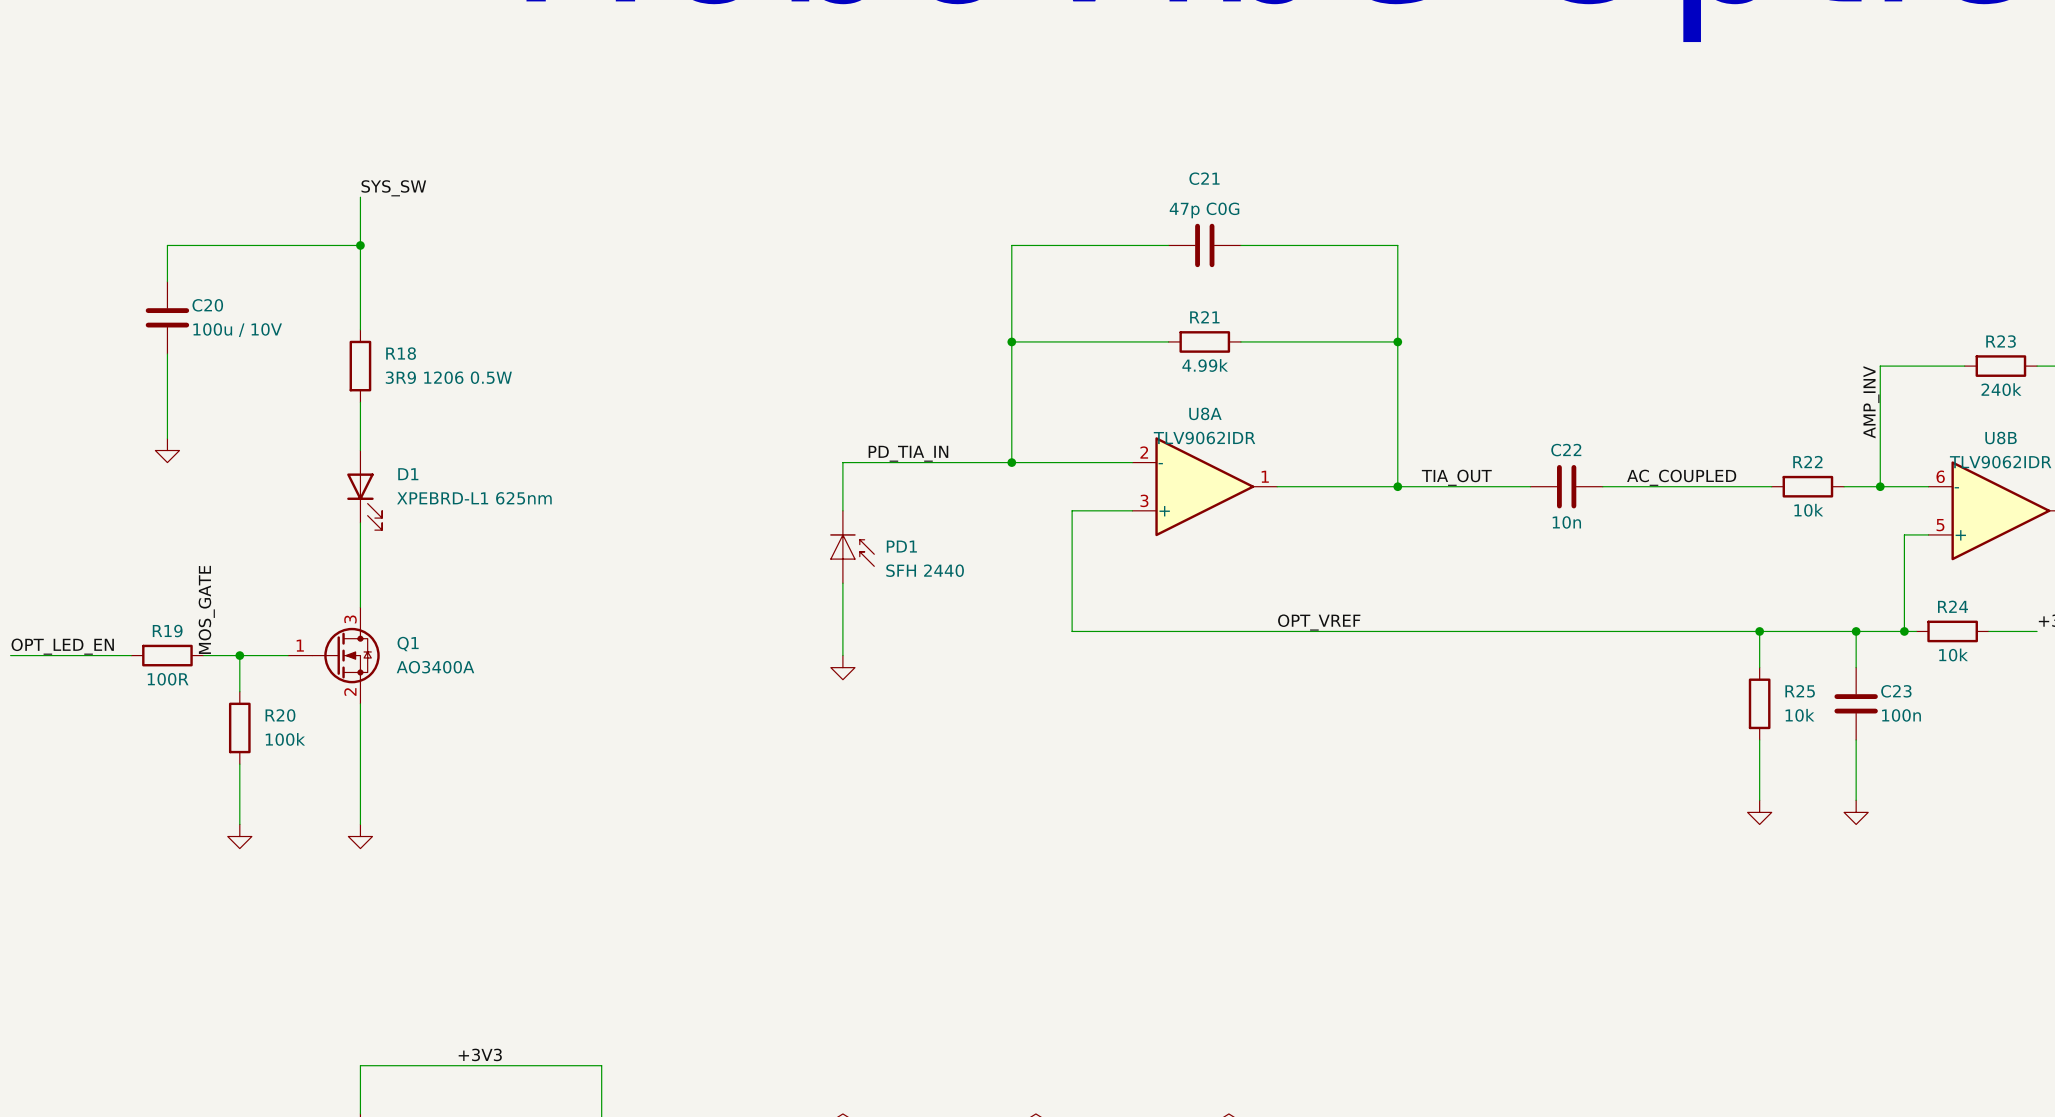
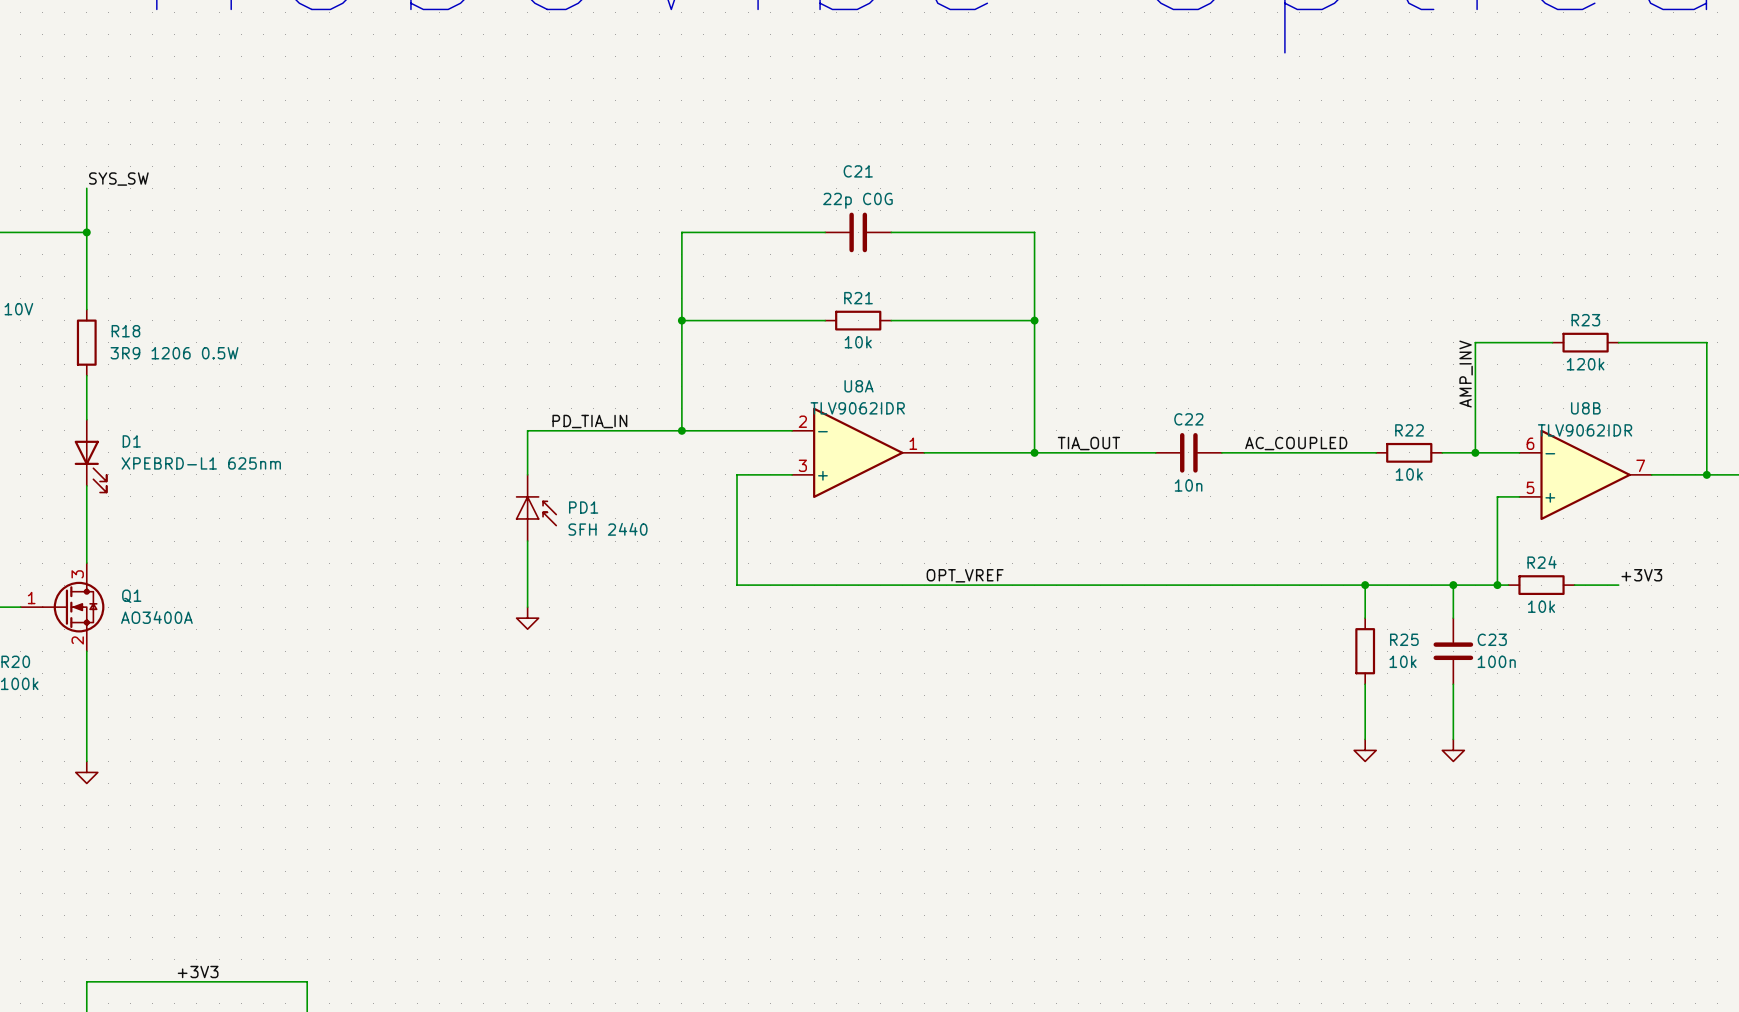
C21 value: 47p C0G (1204, 210) -> 22p C0G (857, 200)
R21 value: 4.99k (1205, 365) -> 10k (858, 342)
R23 value: 240k (2001, 389) -> 120k (1585, 364)

